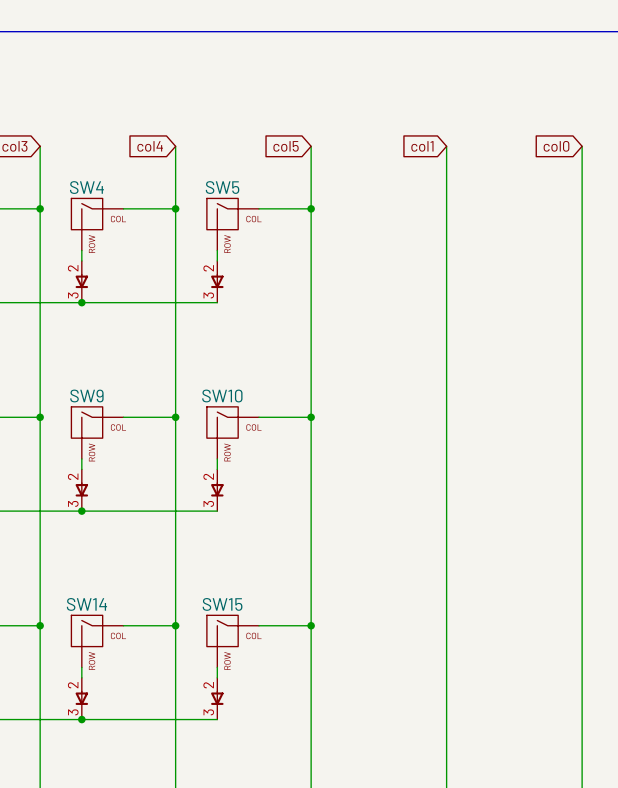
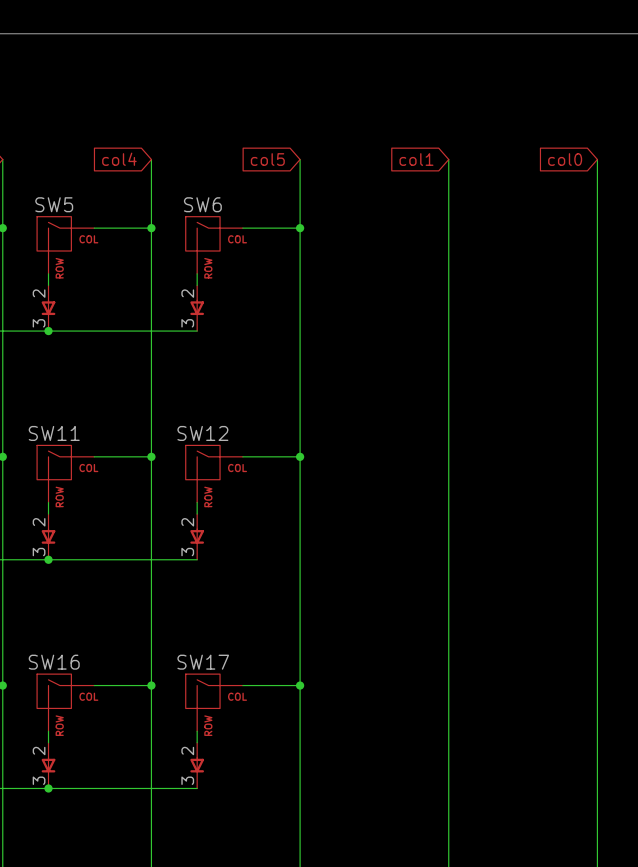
SW4 name: SW4 (86, 187) -> SW5 (54, 204)
SW5 name: SW5 (222, 187) -> SW6 (202, 204)
SW9 name: SW9 (86, 395) -> SW11 (54, 433)
SW10 name: SW10 (222, 395) -> SW12 (202, 433)
SW14 name: SW14 (86, 604) -> SW16 (54, 662)
SW15 name: SW15 (222, 604) -> SW17 (203, 662)

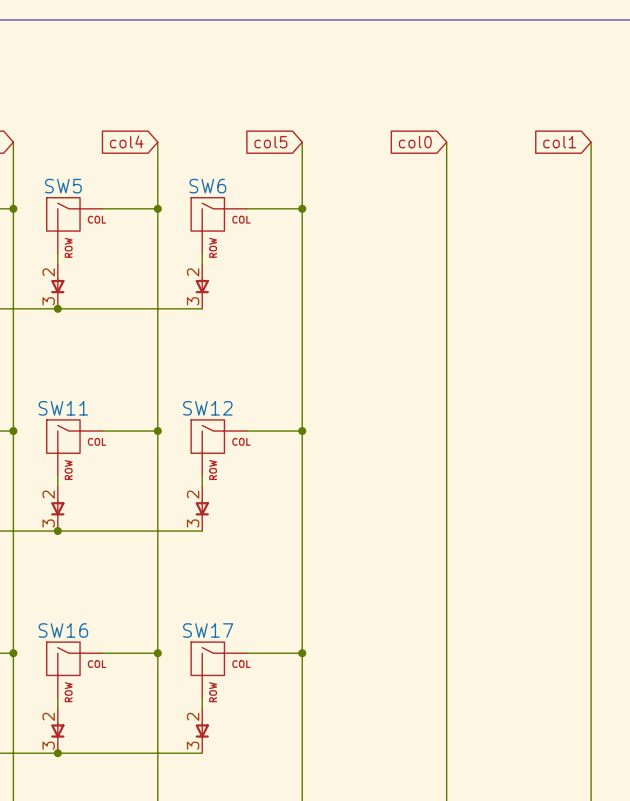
global label: col1 (416, 159) -> col0 (415, 142)
global label: col0 (565, 159) -> col1 (559, 142)

